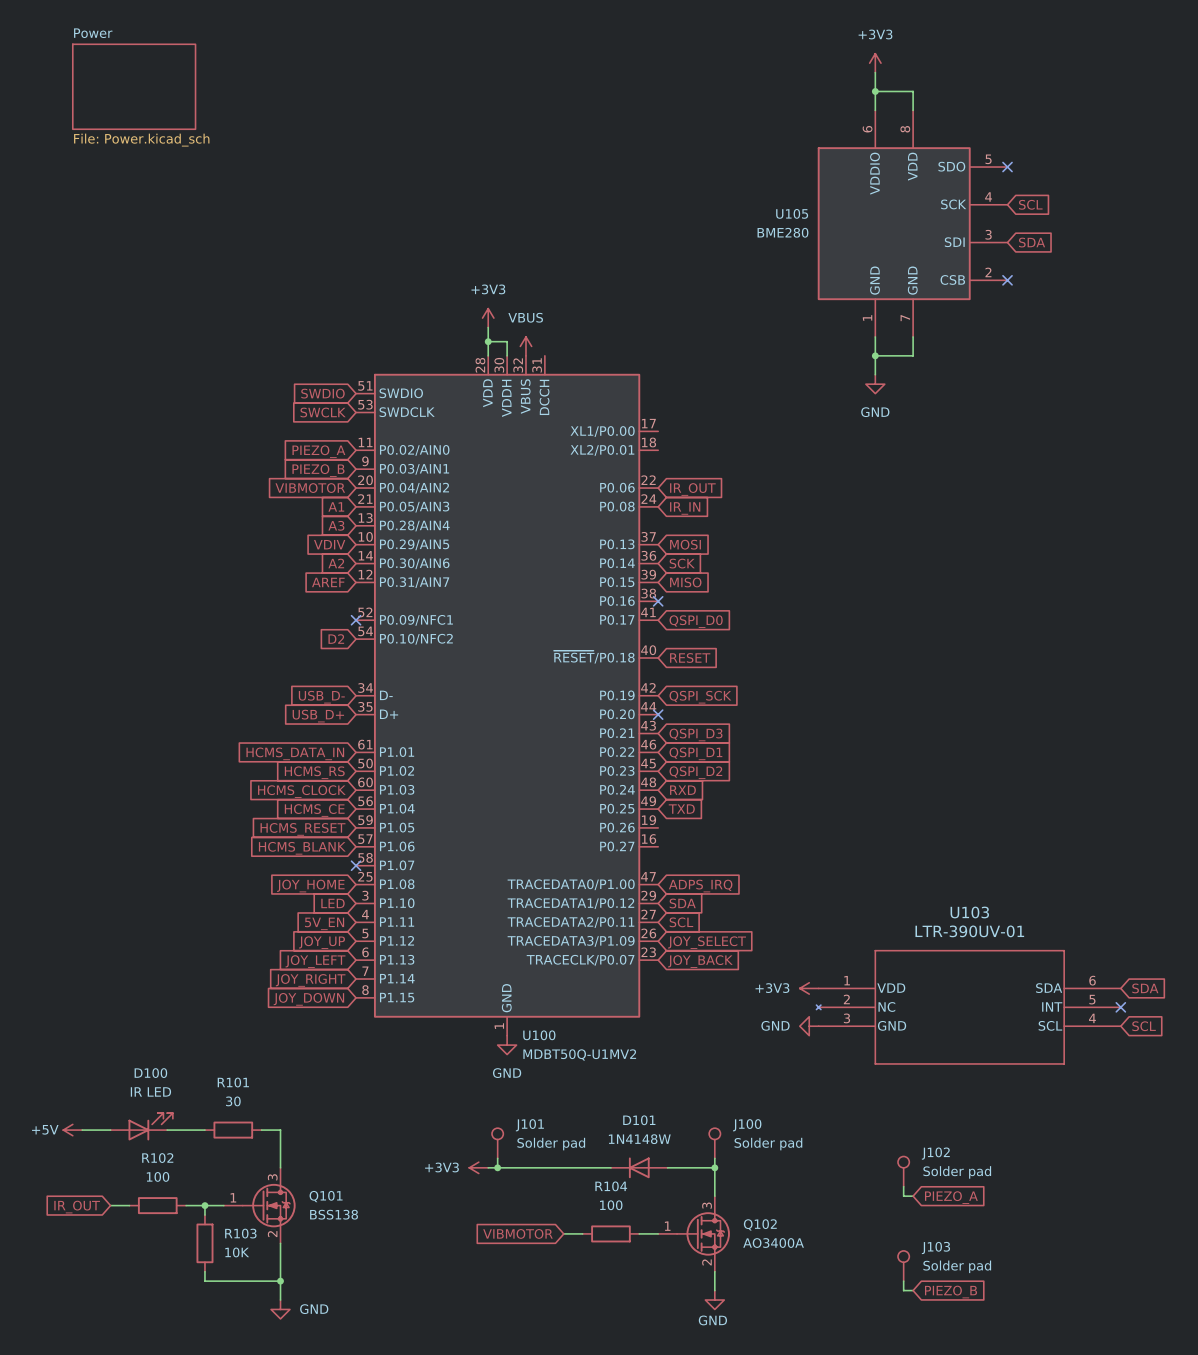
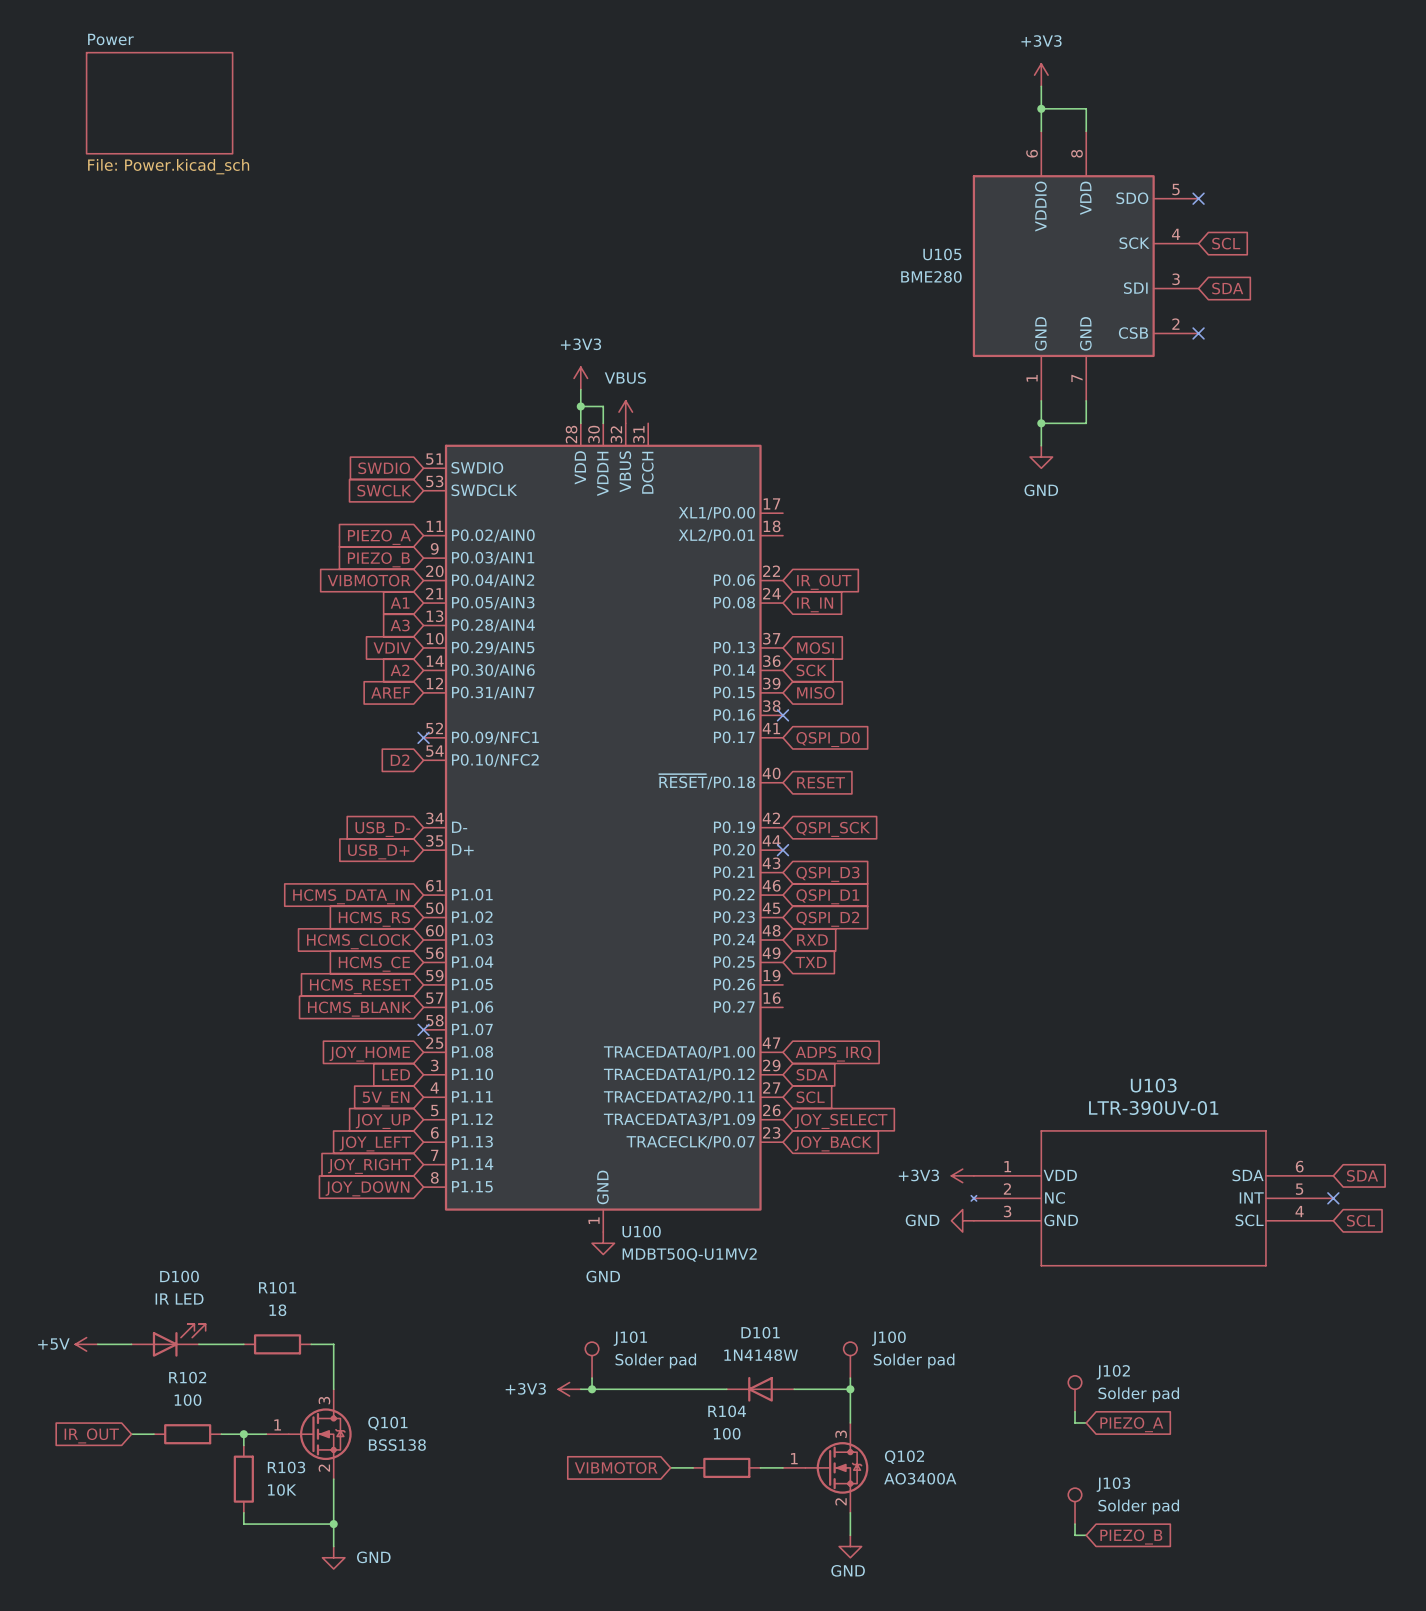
R101 value: 30 (233, 1101) -> 18 (277, 1310)

